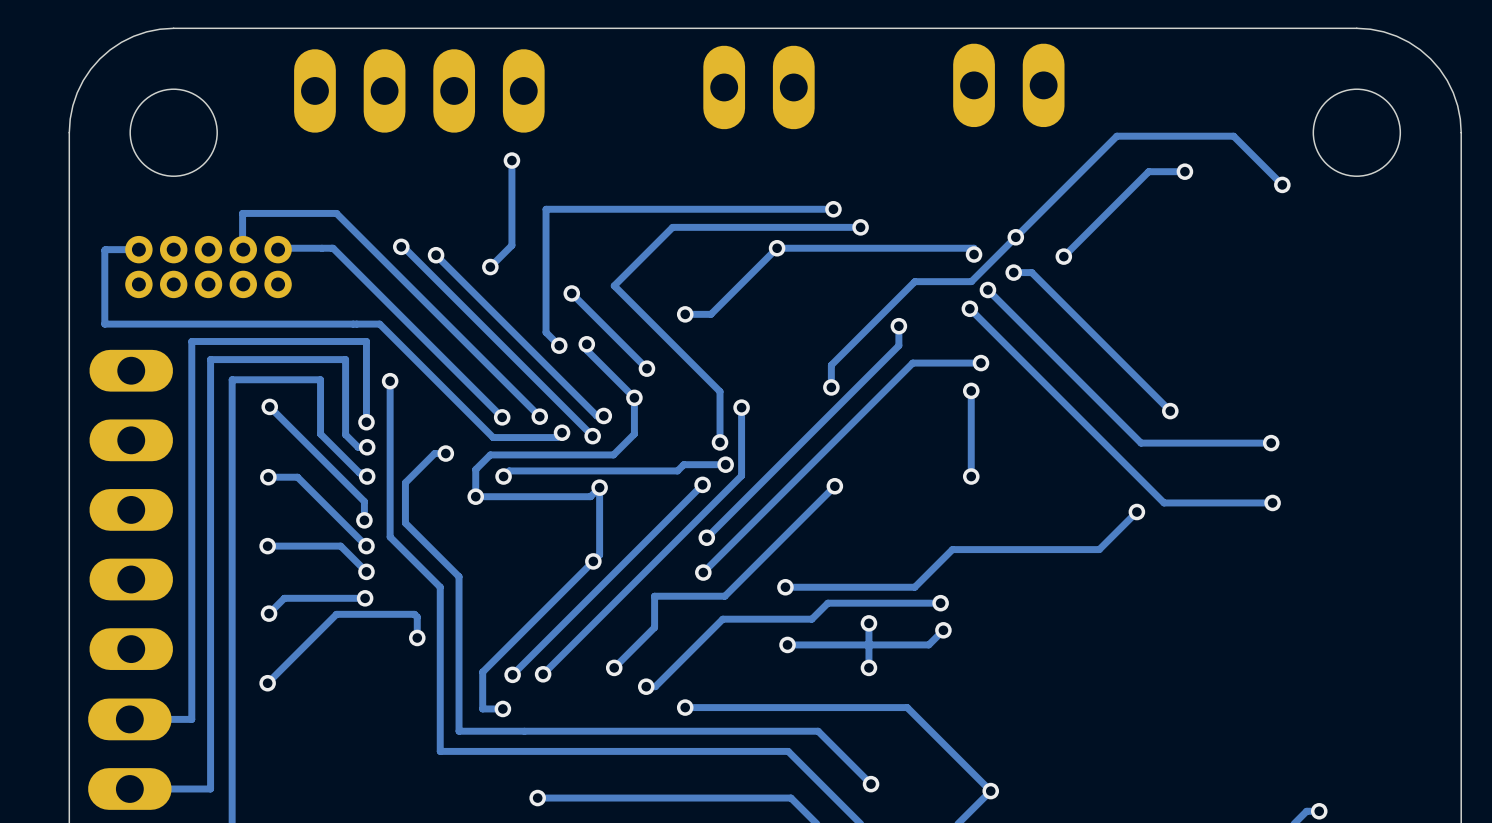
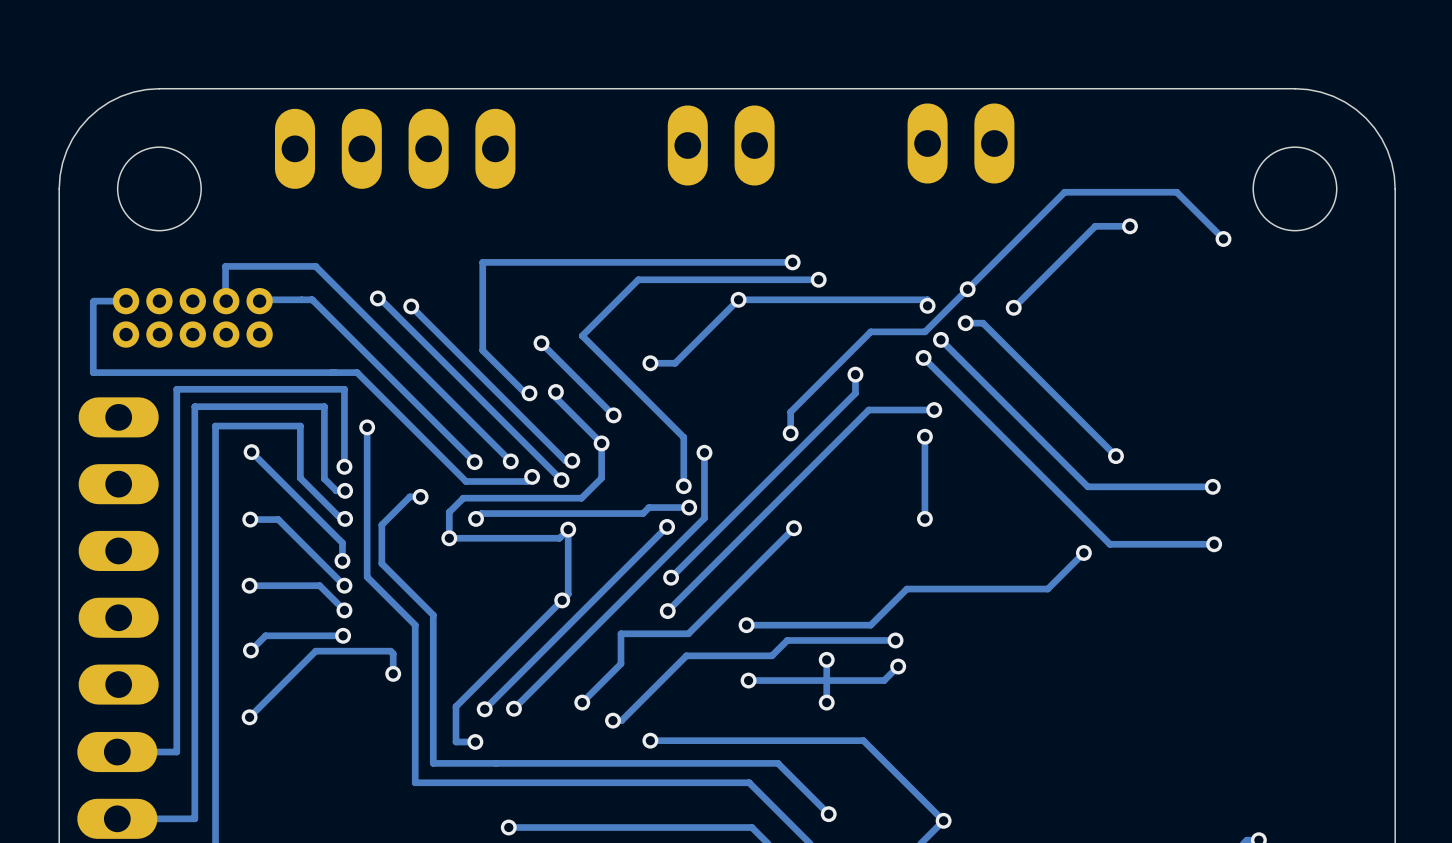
track: (511, 160) (511, 245) (490, 267) -> none
via: (511, 160) -> none
track: (546, 209) (546, 332) (559, 345) -> (516, 262) (482, 262) (482, 350) (525, 393) (529, 393)
via: (490, 267) -> none

